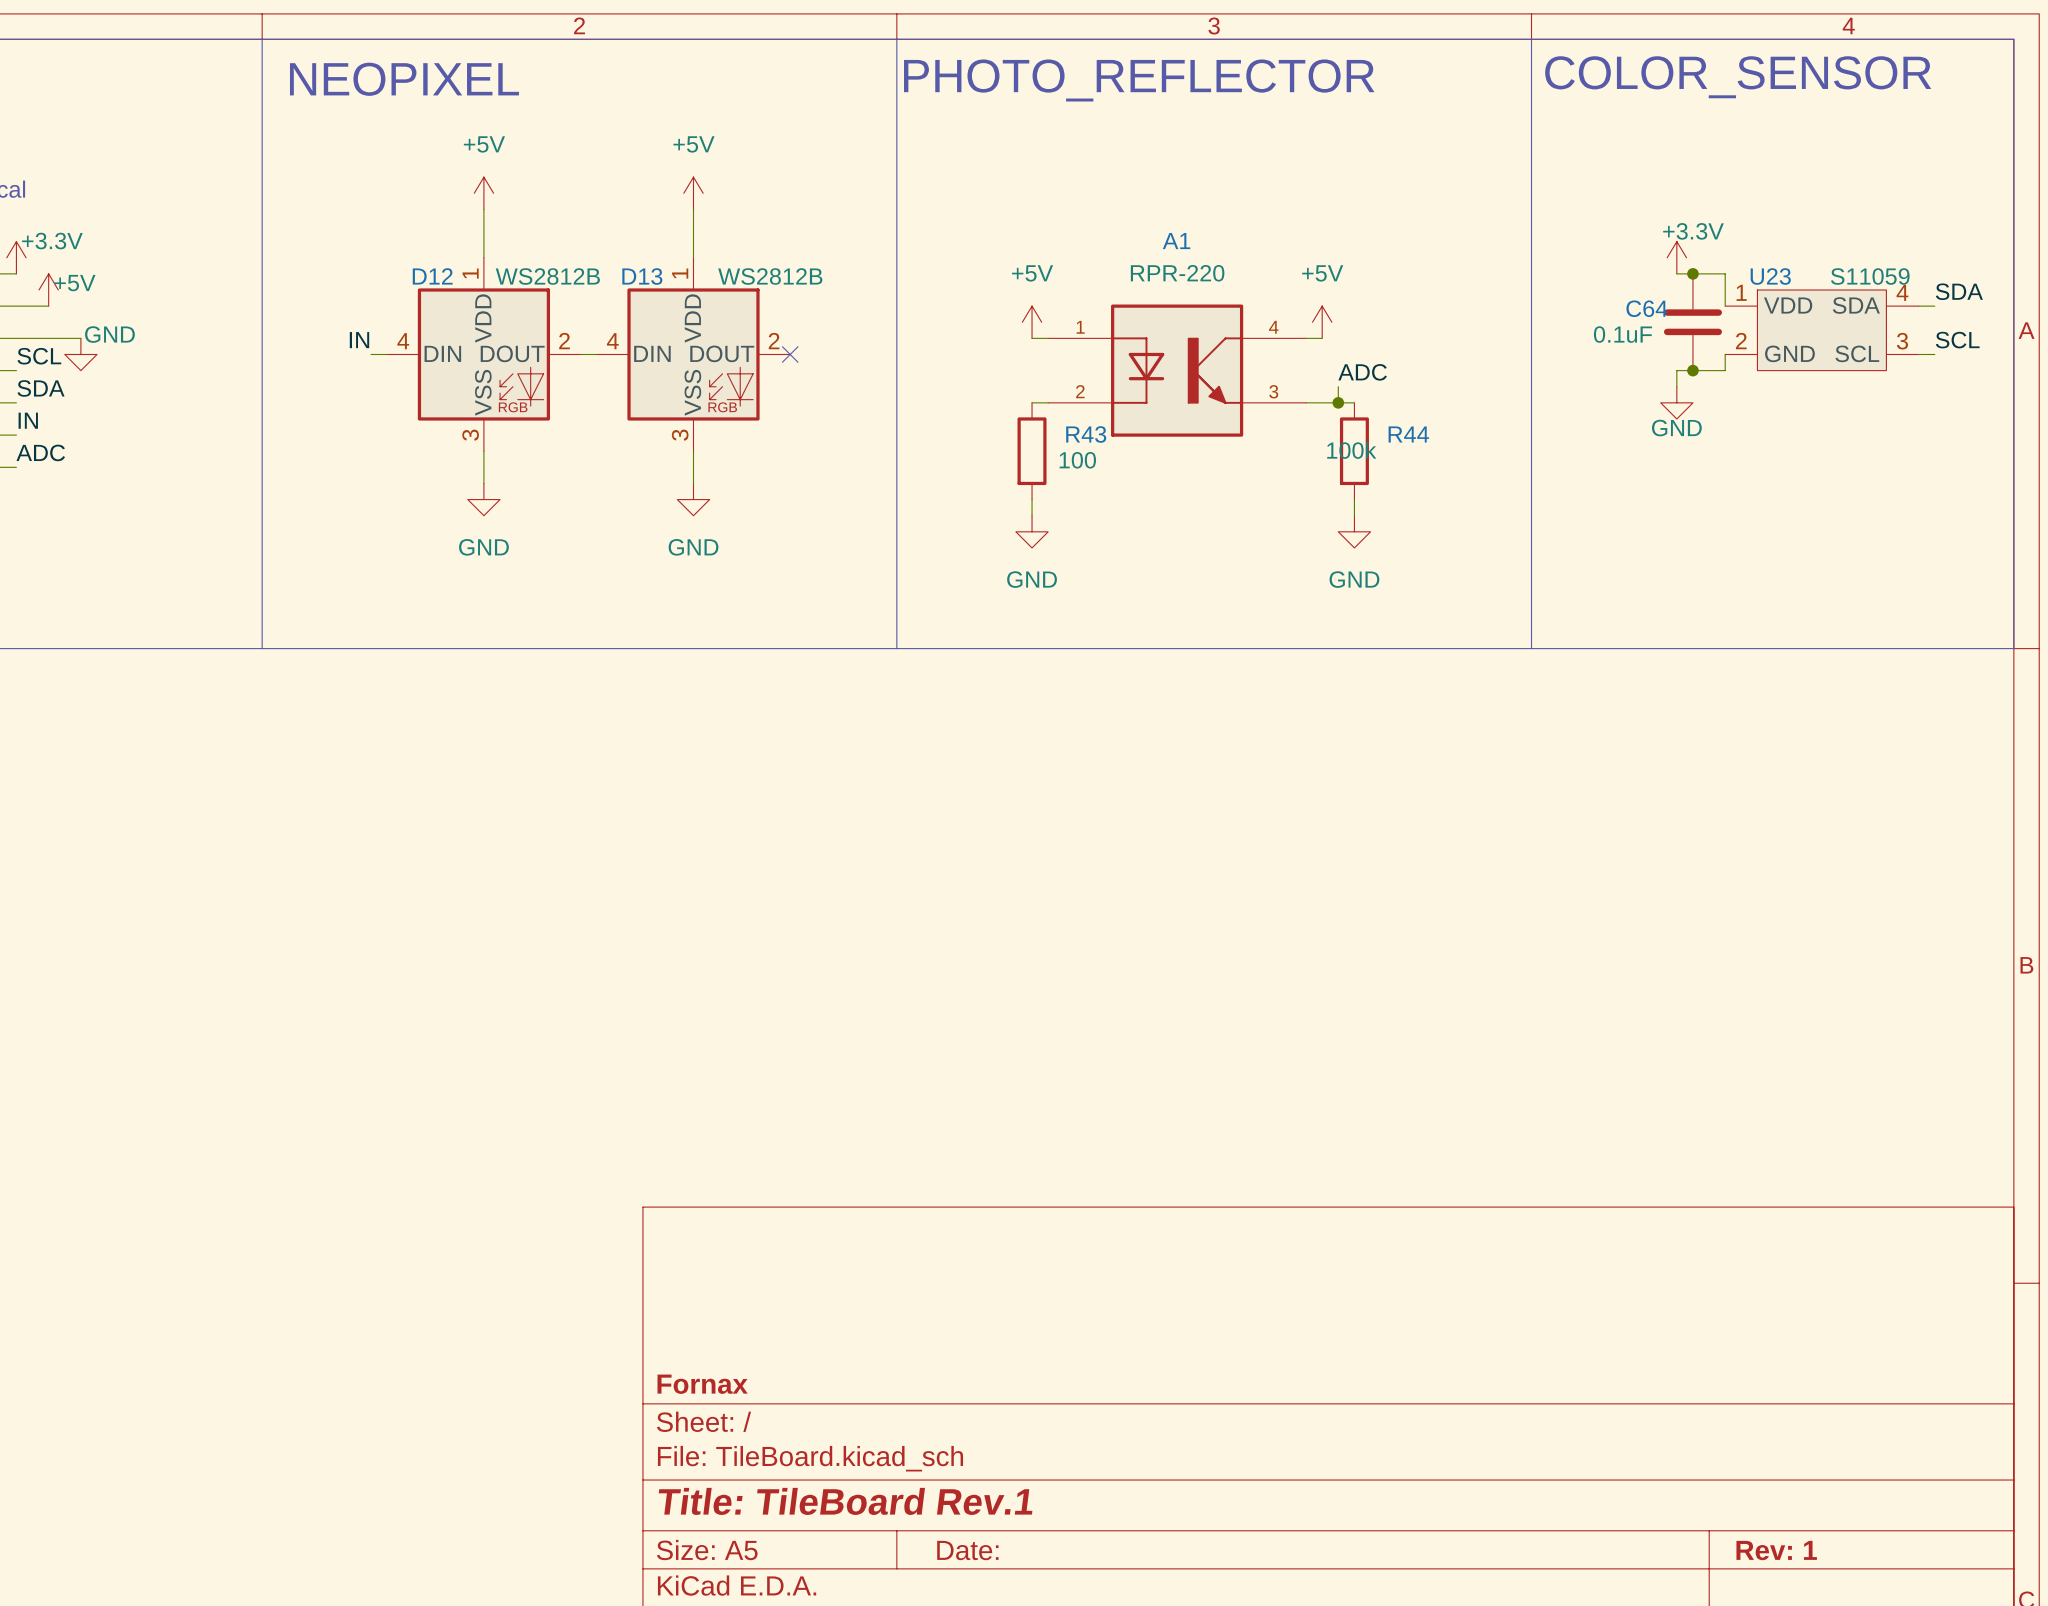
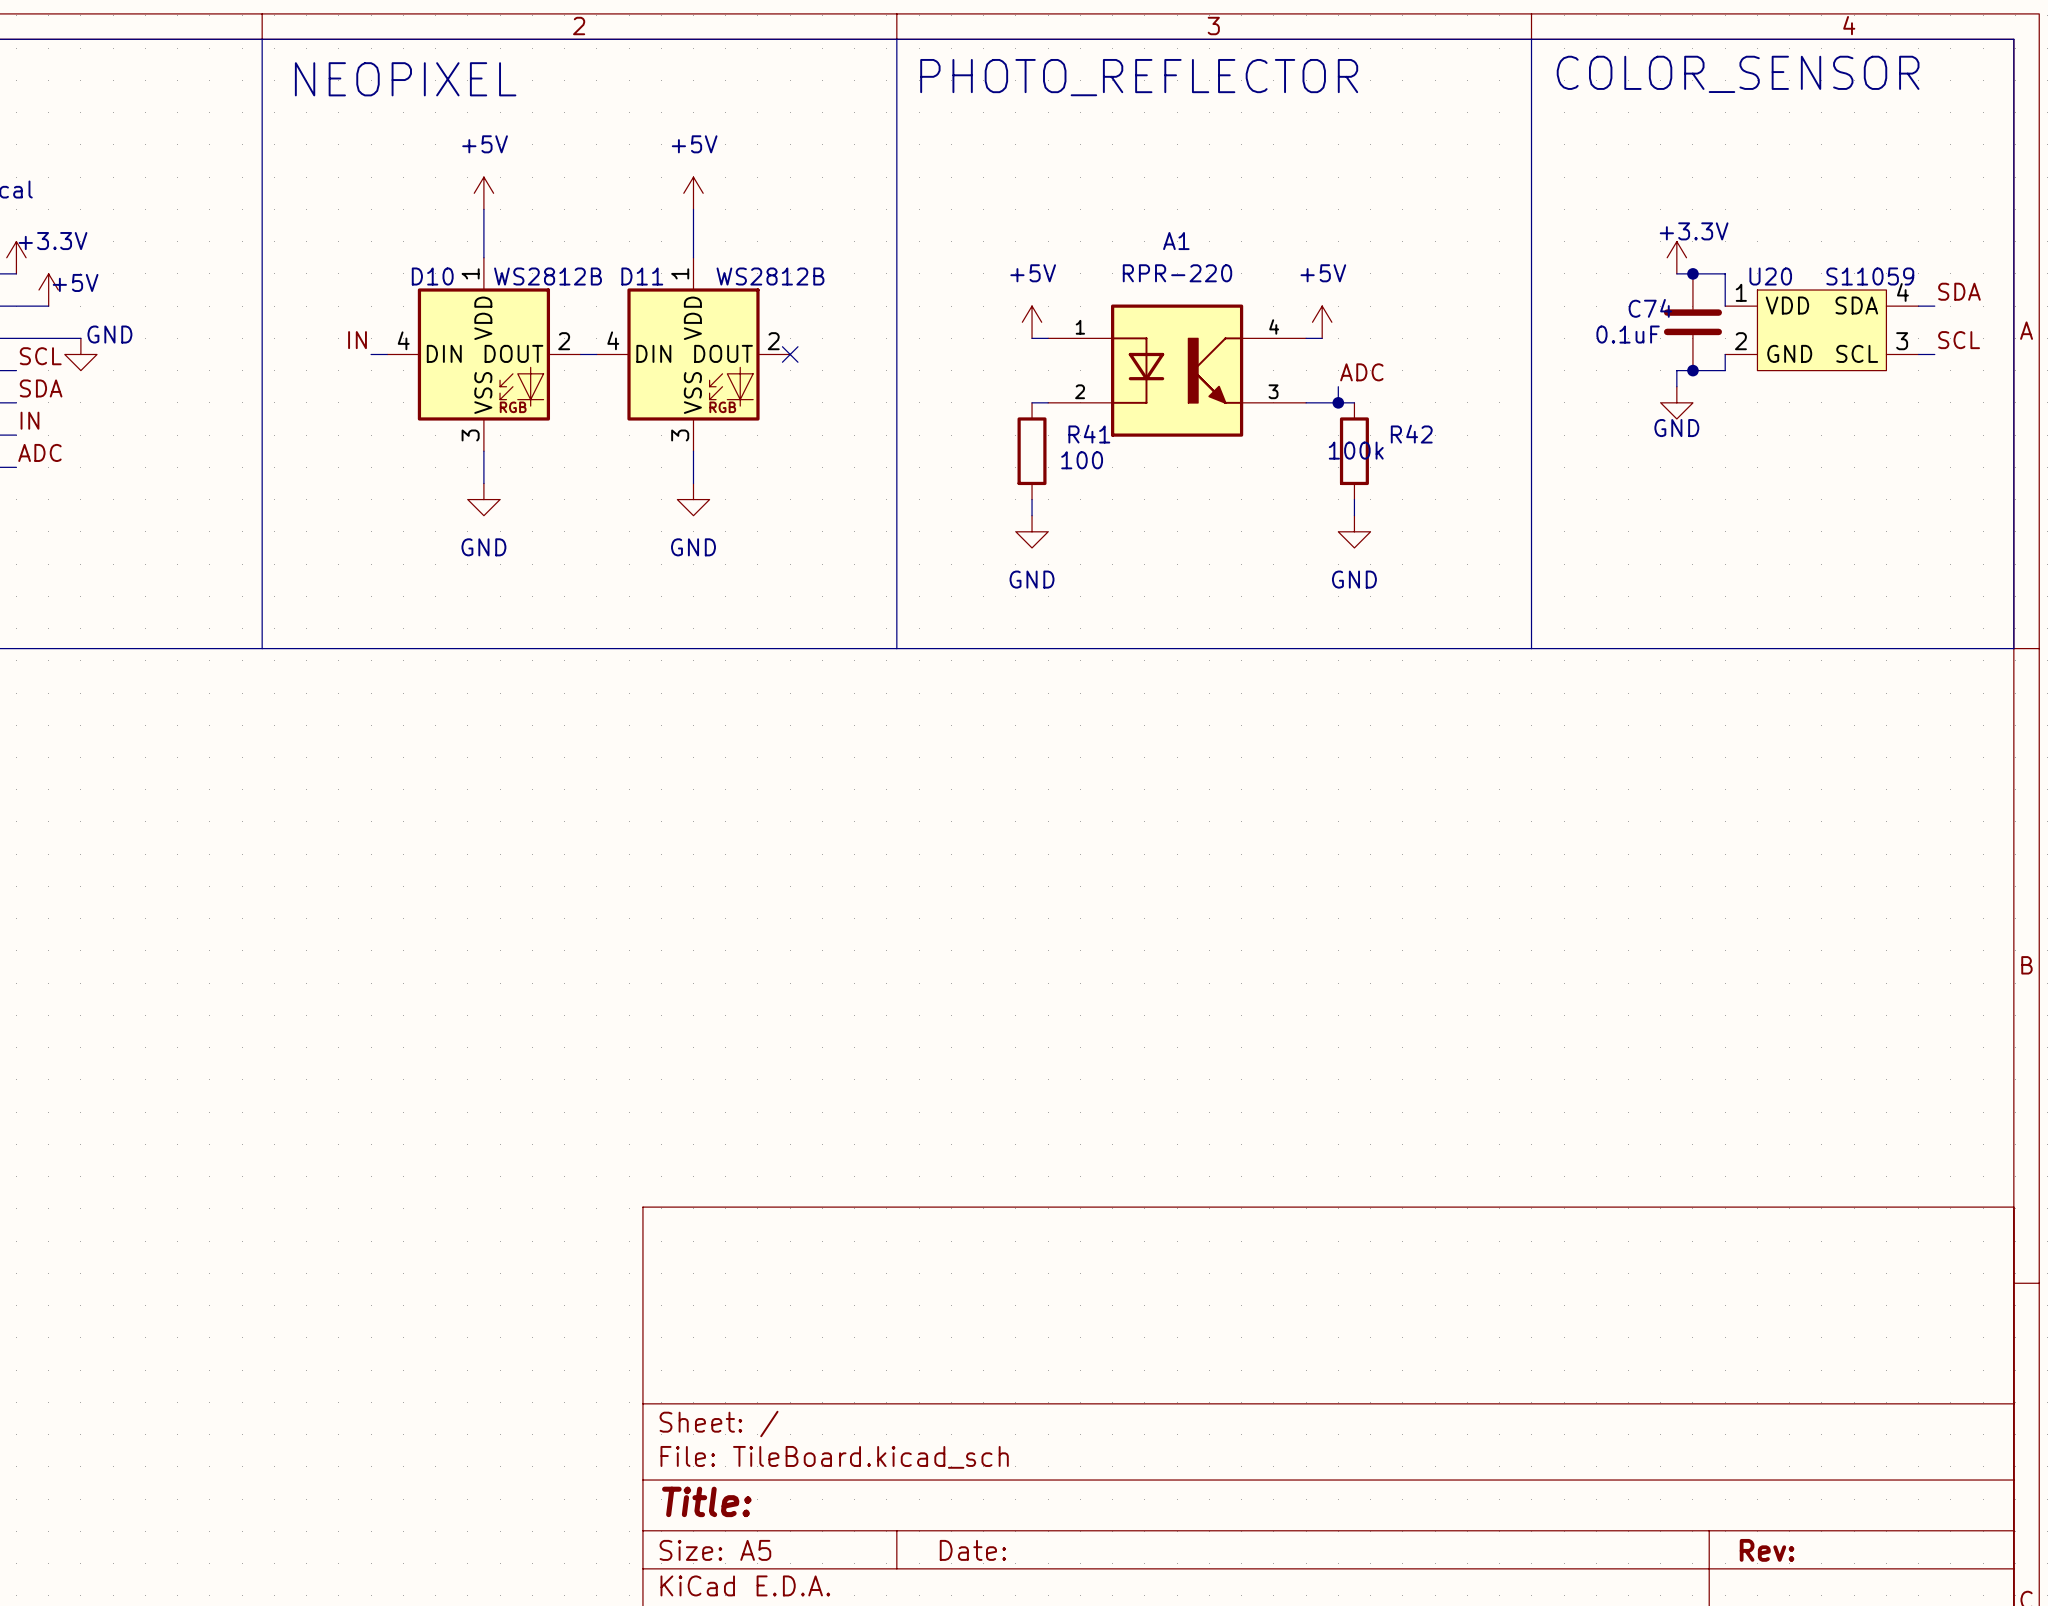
D12 name: D12 (432, 276) -> D10 (432, 276)
D13 name: D13 (642, 276) -> D11 (642, 276)
U23 name: U23 (1770, 276) -> U20 (1770, 276)
C64 name: C64 (1647, 308) -> C74 (1650, 308)
R43 name: R43 (1086, 434) -> R41 (1089, 434)
R44 name: R44 (1408, 434) -> R42 (1411, 434)
title block: Fornax (702, 1384) -> none
title block: Title: TileBoard Rev.1 (845, 1501) -> Title: (706, 1501)
title block: Rev: 1 (1776, 1550) -> Rev: (1767, 1550)

